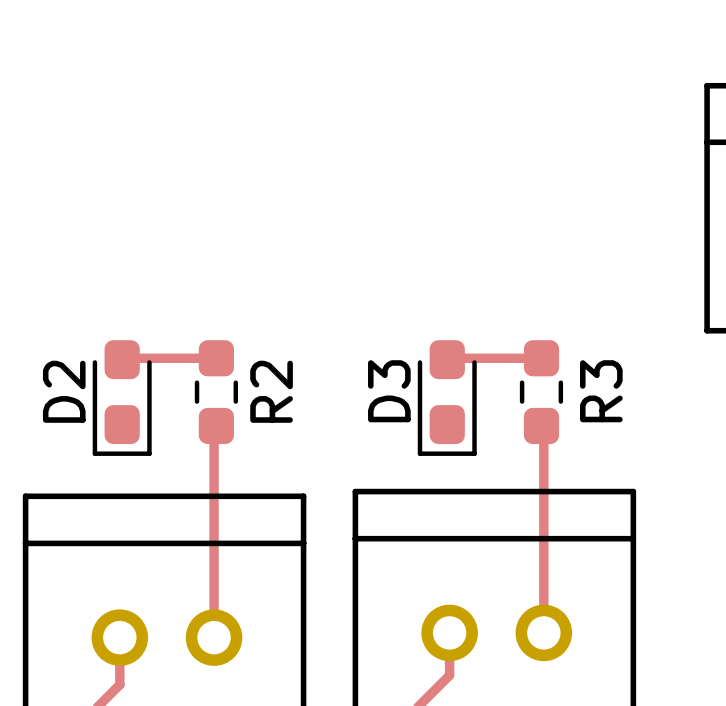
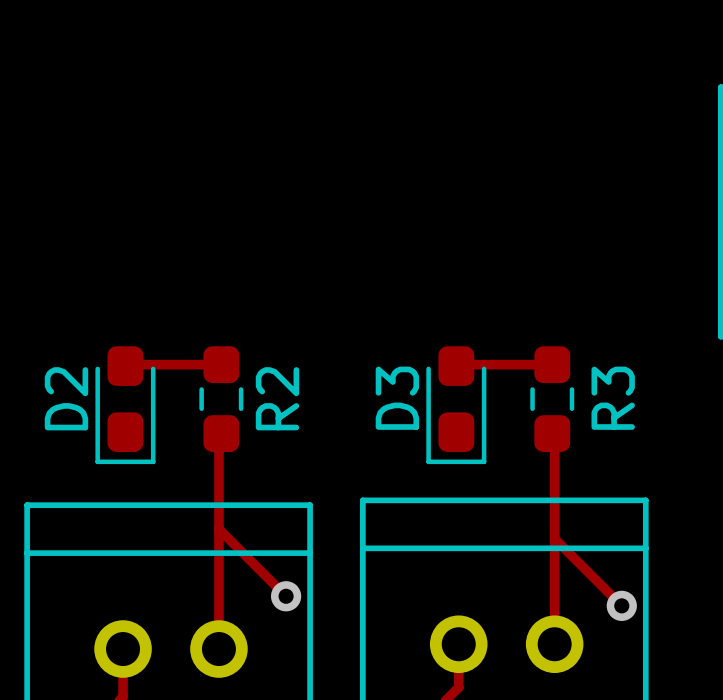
track: none -> (218, 529) (286, 596)
track: none -> (554, 538) (621, 605)
via: none -> (286, 596)
via: none -> (621, 605)

